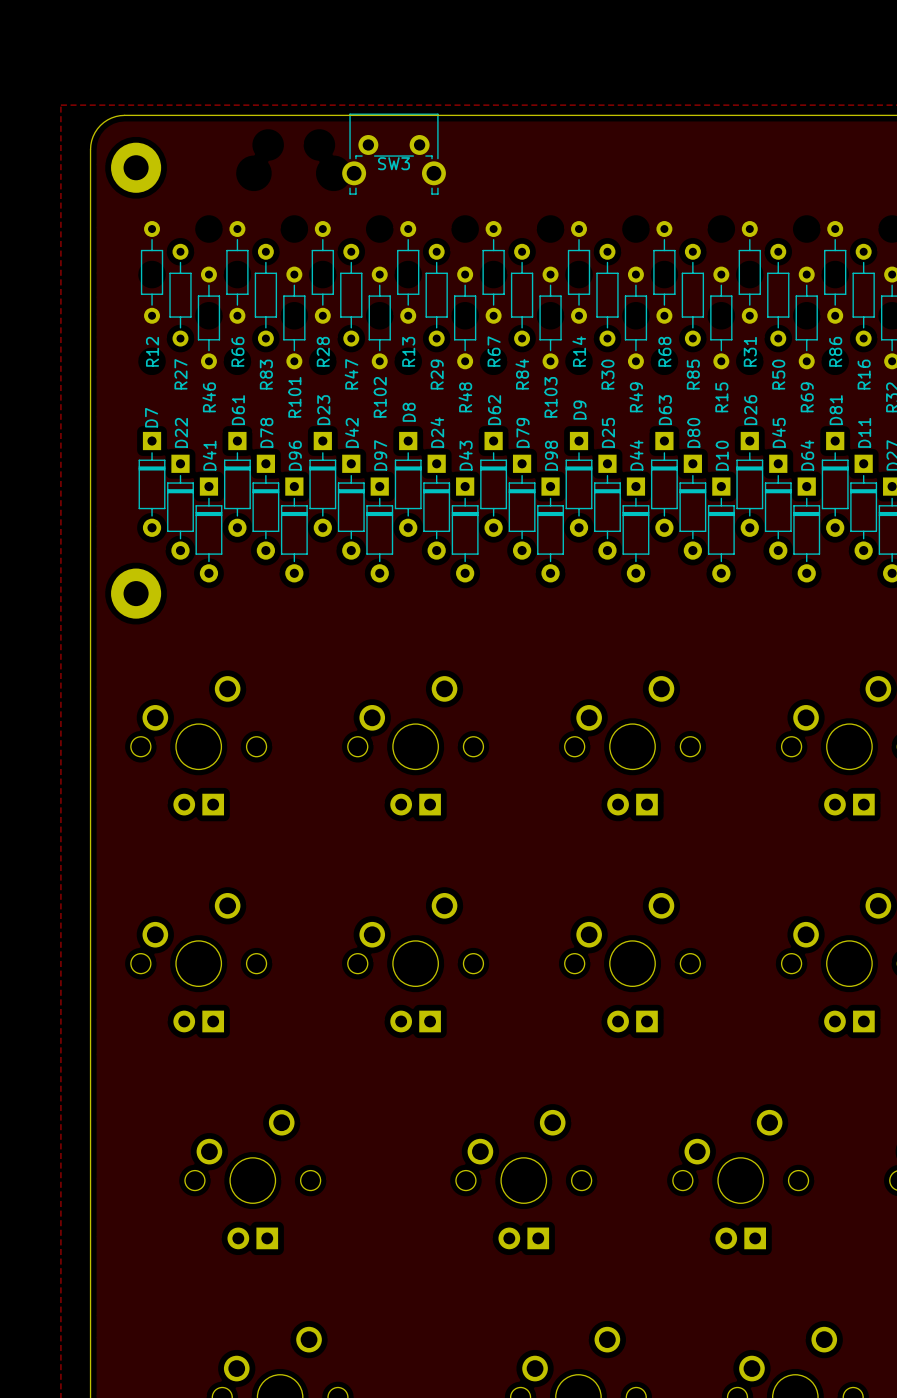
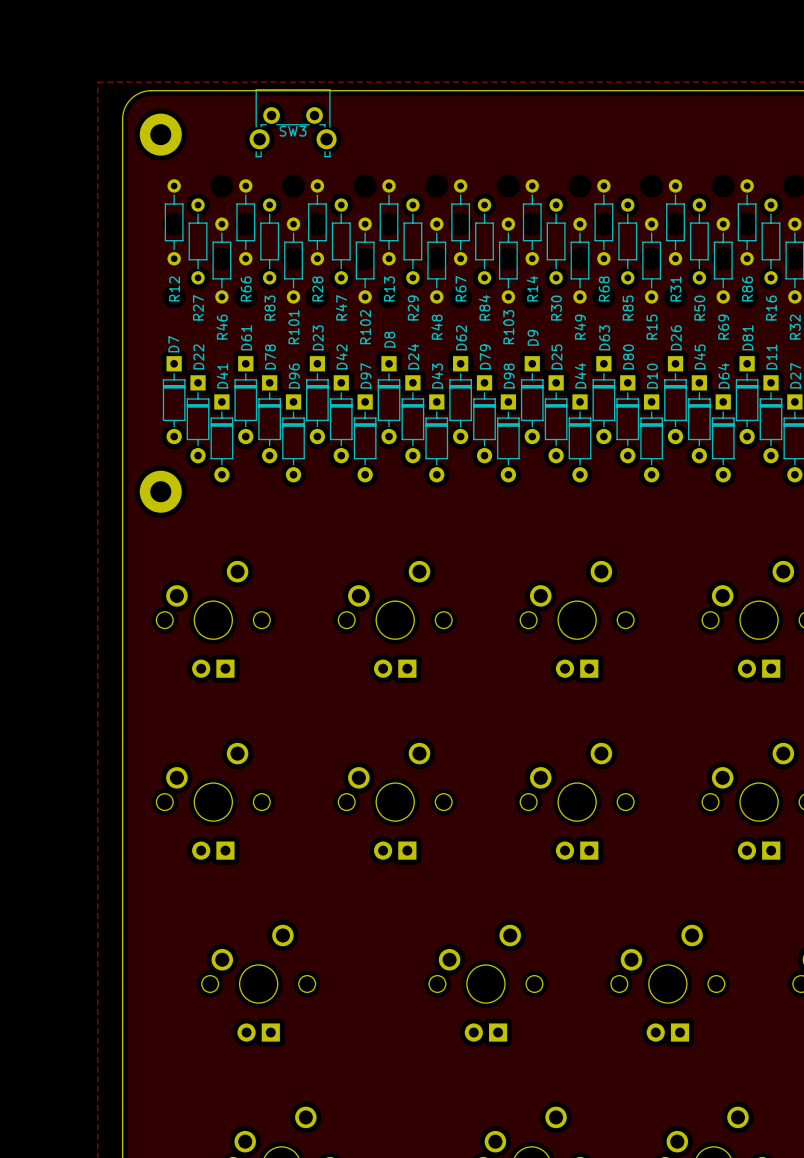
SW3 position: (394, 154) -> (293, 123)

